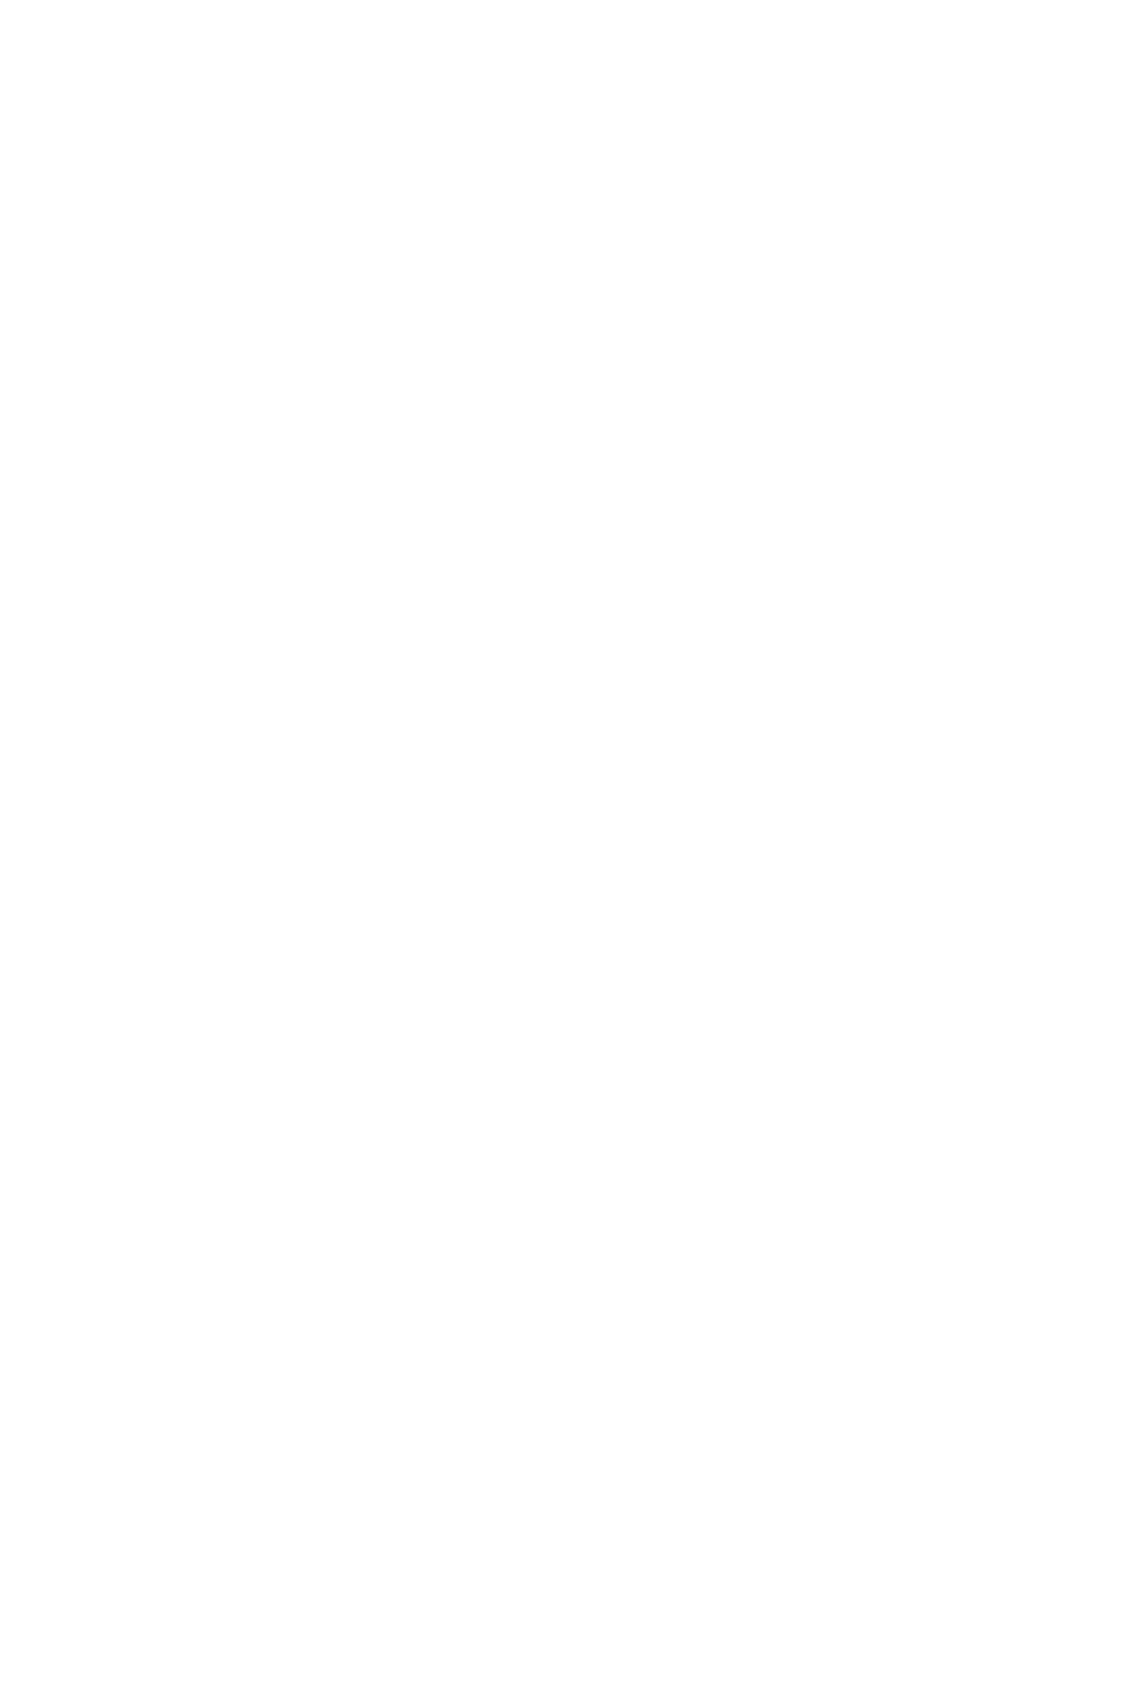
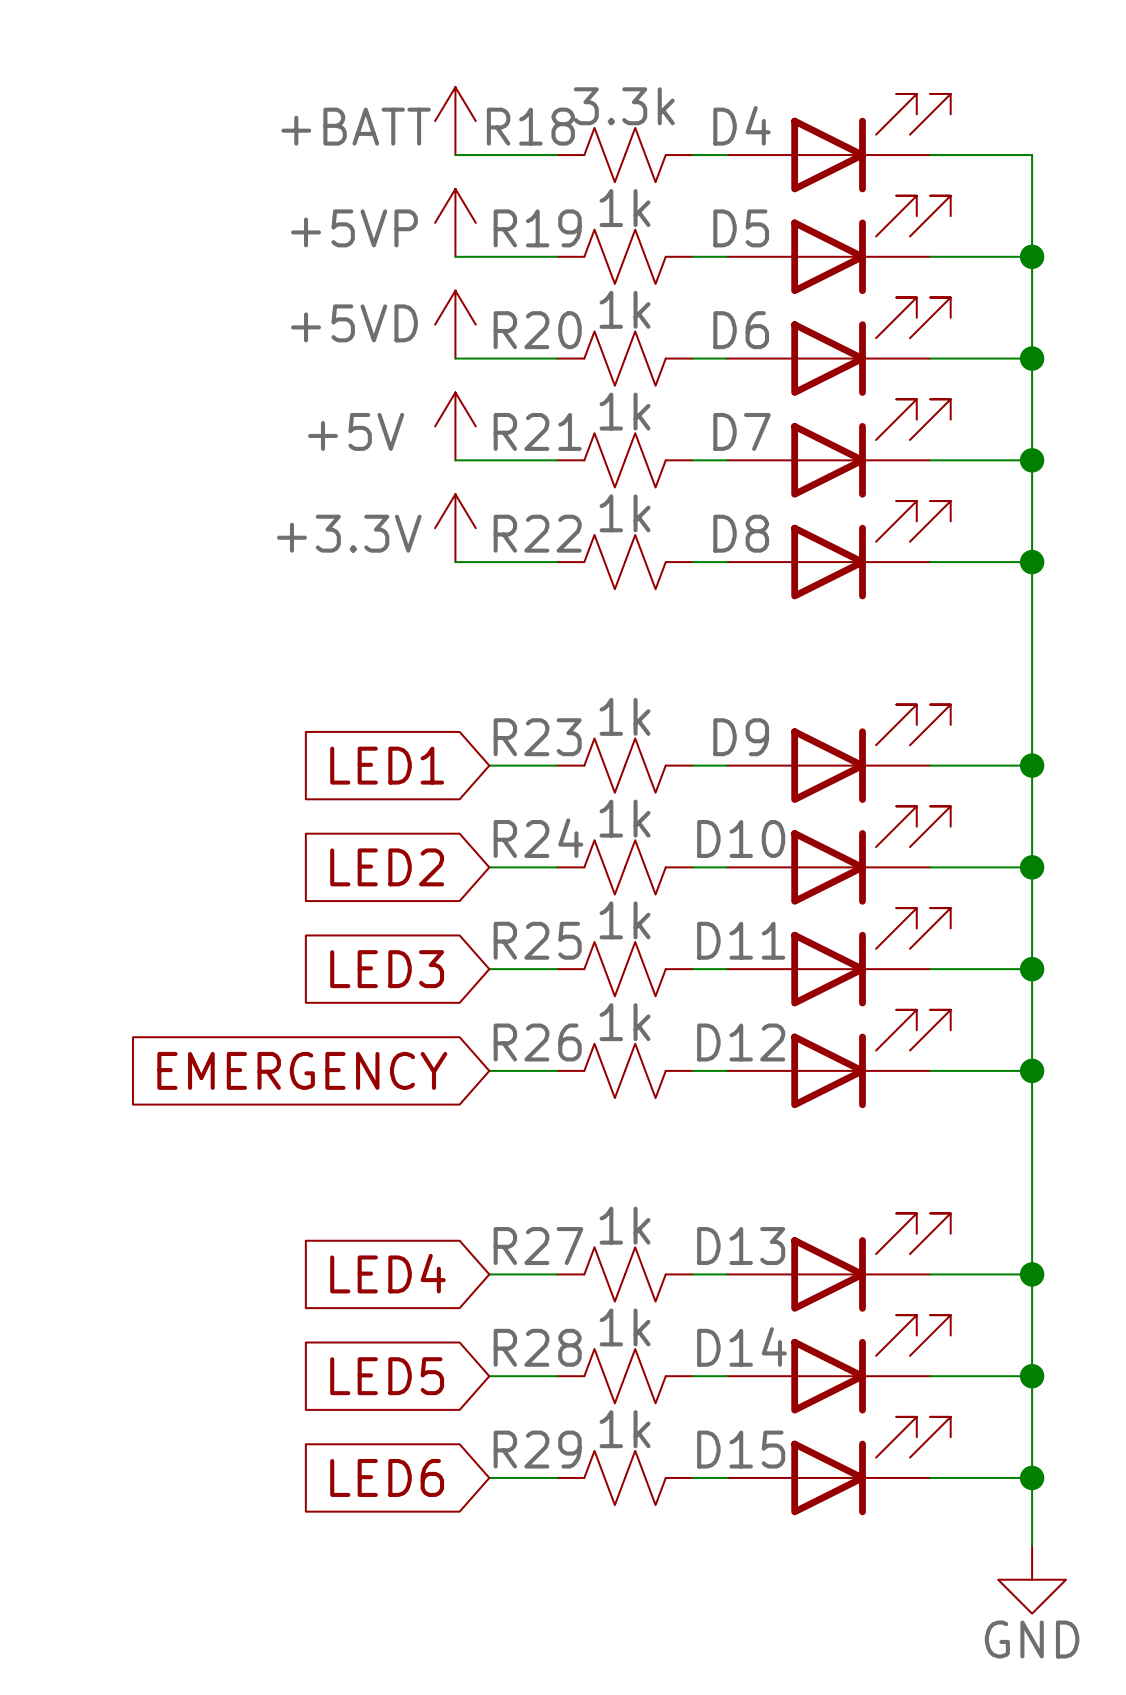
power symbol: none -> +BATT (455, 121)
D4: none -> (838, 143)
wire: none -> (455, 155) (557, 155)
R18: none -> 3.3k (625, 155)
wire: none -> (692, 155) (726, 155)
wire: none -> (930, 155) (1032, 155) (1032, 1545)
power symbol: none -> +5VP (455, 222)
D5: none -> (838, 244)
wire: none -> (455, 256) (557, 256)
R19: none -> 1k (625, 256)
wire: none -> (692, 256) (726, 256)
wire: none -> (930, 256) (1032, 256)
junction: none -> (1032, 256)
power symbol: none -> +5VD (455, 324)
D6: none -> (838, 346)
wire: none -> (455, 358) (557, 358)
R20: none -> 1k (625, 358)
wire: none -> (692, 358) (726, 358)
wire: none -> (930, 358) (1032, 358)
junction: none -> (1032, 358)
power symbol: none -> +5V (455, 426)
D7: none -> (838, 448)
wire: none -> (455, 460) (557, 460)
R21: none -> 1k (625, 460)
wire: none -> (692, 460) (726, 460)
wire: none -> (930, 460) (1032, 460)
junction: none -> (1032, 460)
power symbol: none -> +3.3V (455, 528)
D8: none -> (838, 550)
wire: none -> (455, 562) (557, 562)
R22: none -> 1k (625, 562)
wire: none -> (692, 562) (726, 562)
wire: none -> (930, 562) (1032, 562)
junction: none -> (1032, 562)
D9: none -> (838, 753)
global label: none -> LED1 (387, 765)
wire: none -> (489, 765) (557, 765)
R23: none -> 1k (625, 765)
wire: none -> (692, 765) (726, 765)
wire: none -> (930, 765) (1032, 765)
junction: none -> (1032, 765)
D10: none -> (838, 855)
global label: none -> LED2 (387, 867)
wire: none -> (489, 867) (557, 867)
R24: none -> 1k (625, 867)
wire: none -> (692, 867) (726, 867)
wire: none -> (930, 867) (1032, 867)
junction: none -> (1032, 867)
D11: none -> (838, 957)
global label: none -> LED3 (387, 969)
wire: none -> (489, 969) (557, 969)
R25: none -> 1k (625, 969)
wire: none -> (692, 969) (726, 969)
wire: none -> (930, 969) (1032, 969)
junction: none -> (1032, 969)
D12: none -> (838, 1059)
global label: none -> EMERGENCY (302, 1070)
wire: none -> (489, 1070) (557, 1070)
R26: none -> 1k (625, 1070)
wire: none -> (692, 1070) (726, 1070)
wire: none -> (930, 1070) (1032, 1070)
junction: none -> (1032, 1070)
D13: none -> (838, 1262)
global label: none -> LED4 (387, 1273)
wire: none -> (489, 1274) (557, 1274)
R27: none -> 1k (625, 1274)
wire: none -> (692, 1274) (726, 1274)
wire: none -> (930, 1274) (1032, 1274)
junction: none -> (1032, 1274)
D14: none -> (838, 1364)
global label: none -> LED5 (387, 1376)
wire: none -> (489, 1376) (557, 1376)
R28: none -> 1k (625, 1376)
wire: none -> (692, 1376) (726, 1376)
wire: none -> (930, 1376) (1032, 1376)
junction: none -> (1032, 1376)
D15: none -> (838, 1466)
global label: none -> LED6 (387, 1477)
wire: none -> (489, 1477) (557, 1477)
R29: none -> 1k (625, 1477)
wire: none -> (692, 1477) (726, 1477)
wire: none -> (930, 1477) (1032, 1477)
junction: none -> (1032, 1477)
power symbol: none -> GND (1032, 1579)

